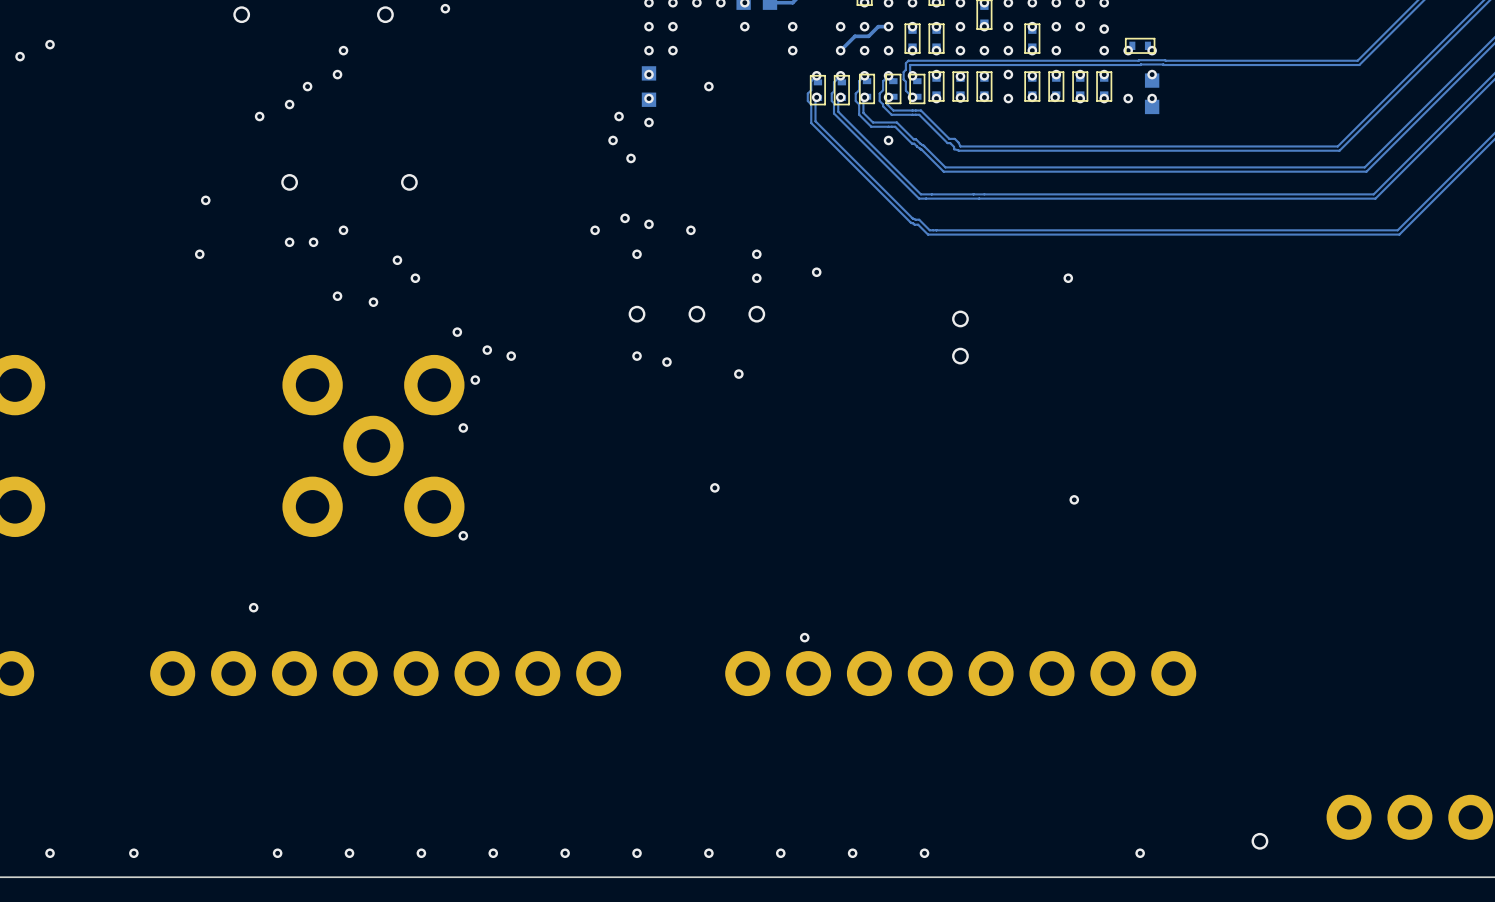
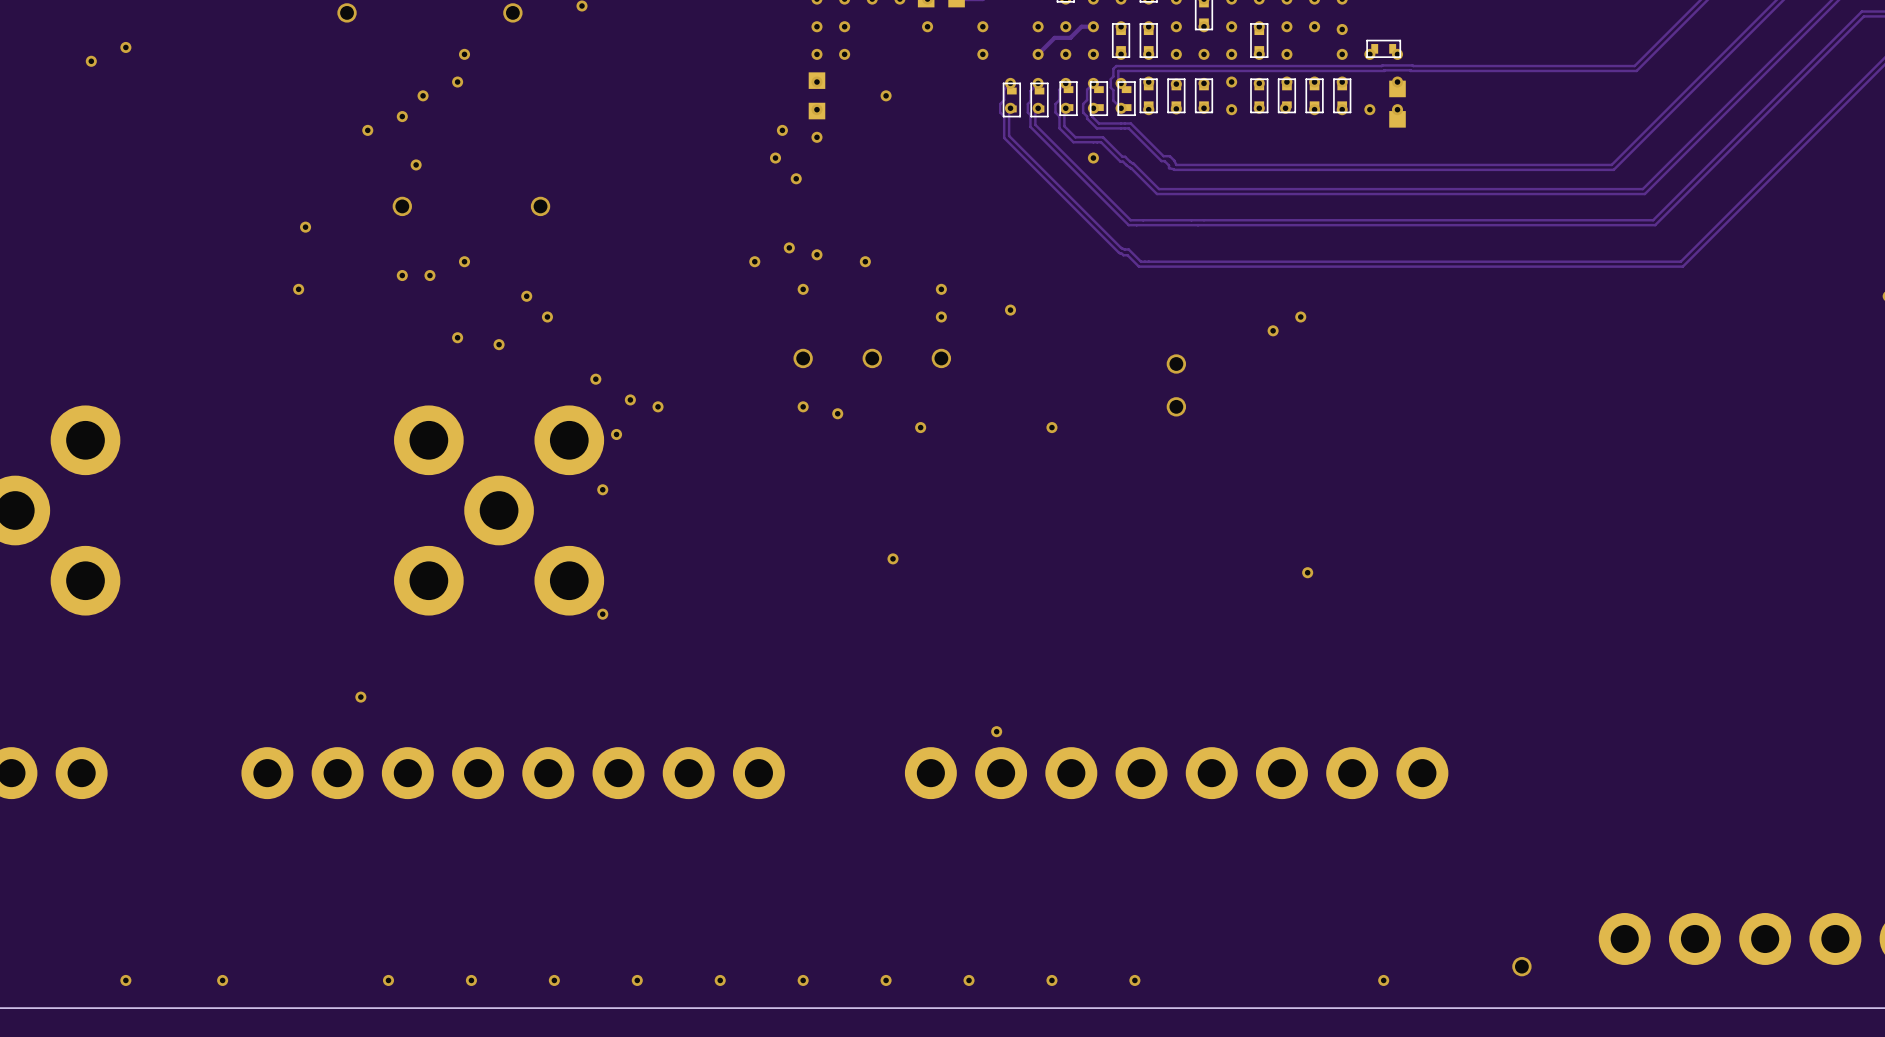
via: none -> (416, 164)
via: none -> (1273, 330)
via: none -> (1051, 427)

